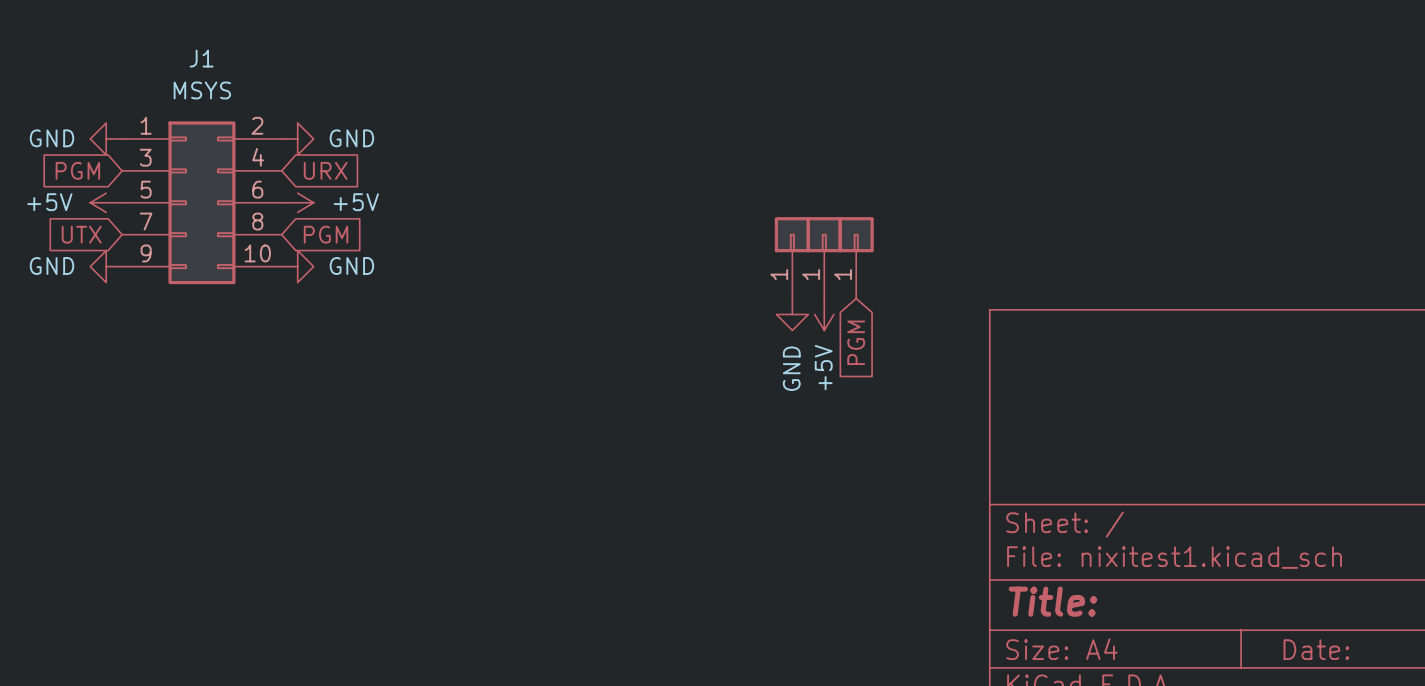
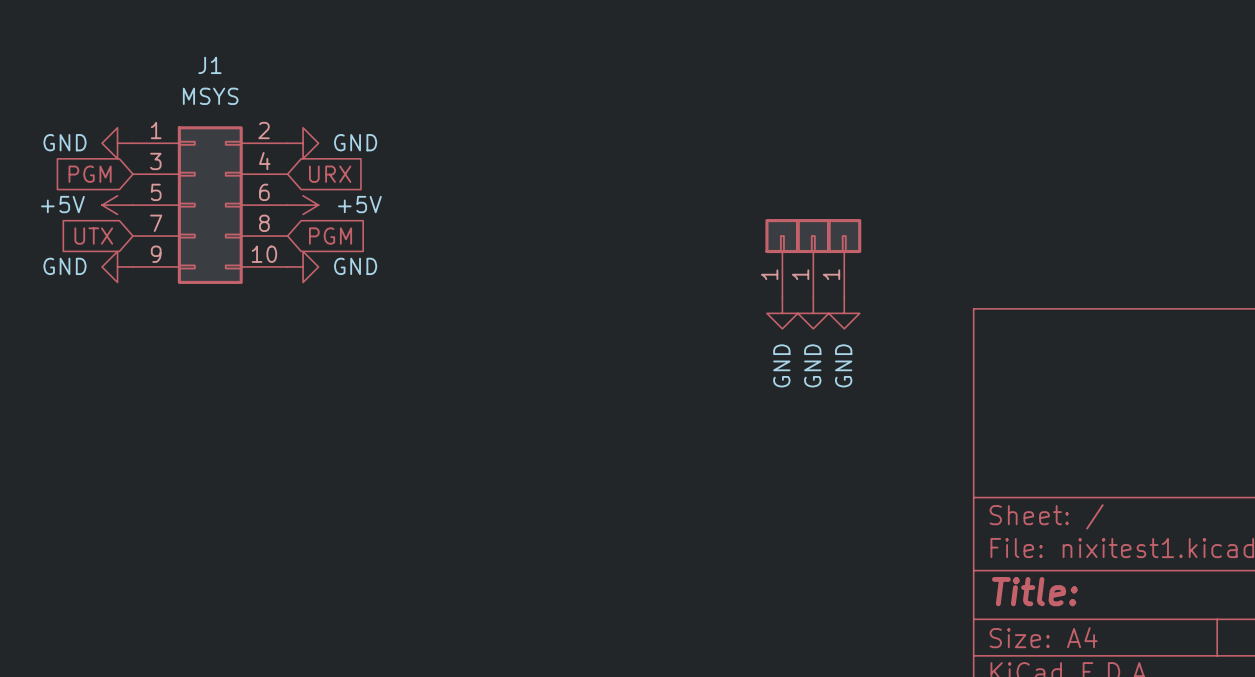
power symbol: +5V (824, 314) -> GND (813, 313)
power symbol: none -> GND (844, 313)
global label: PGM (856, 342) -> none

